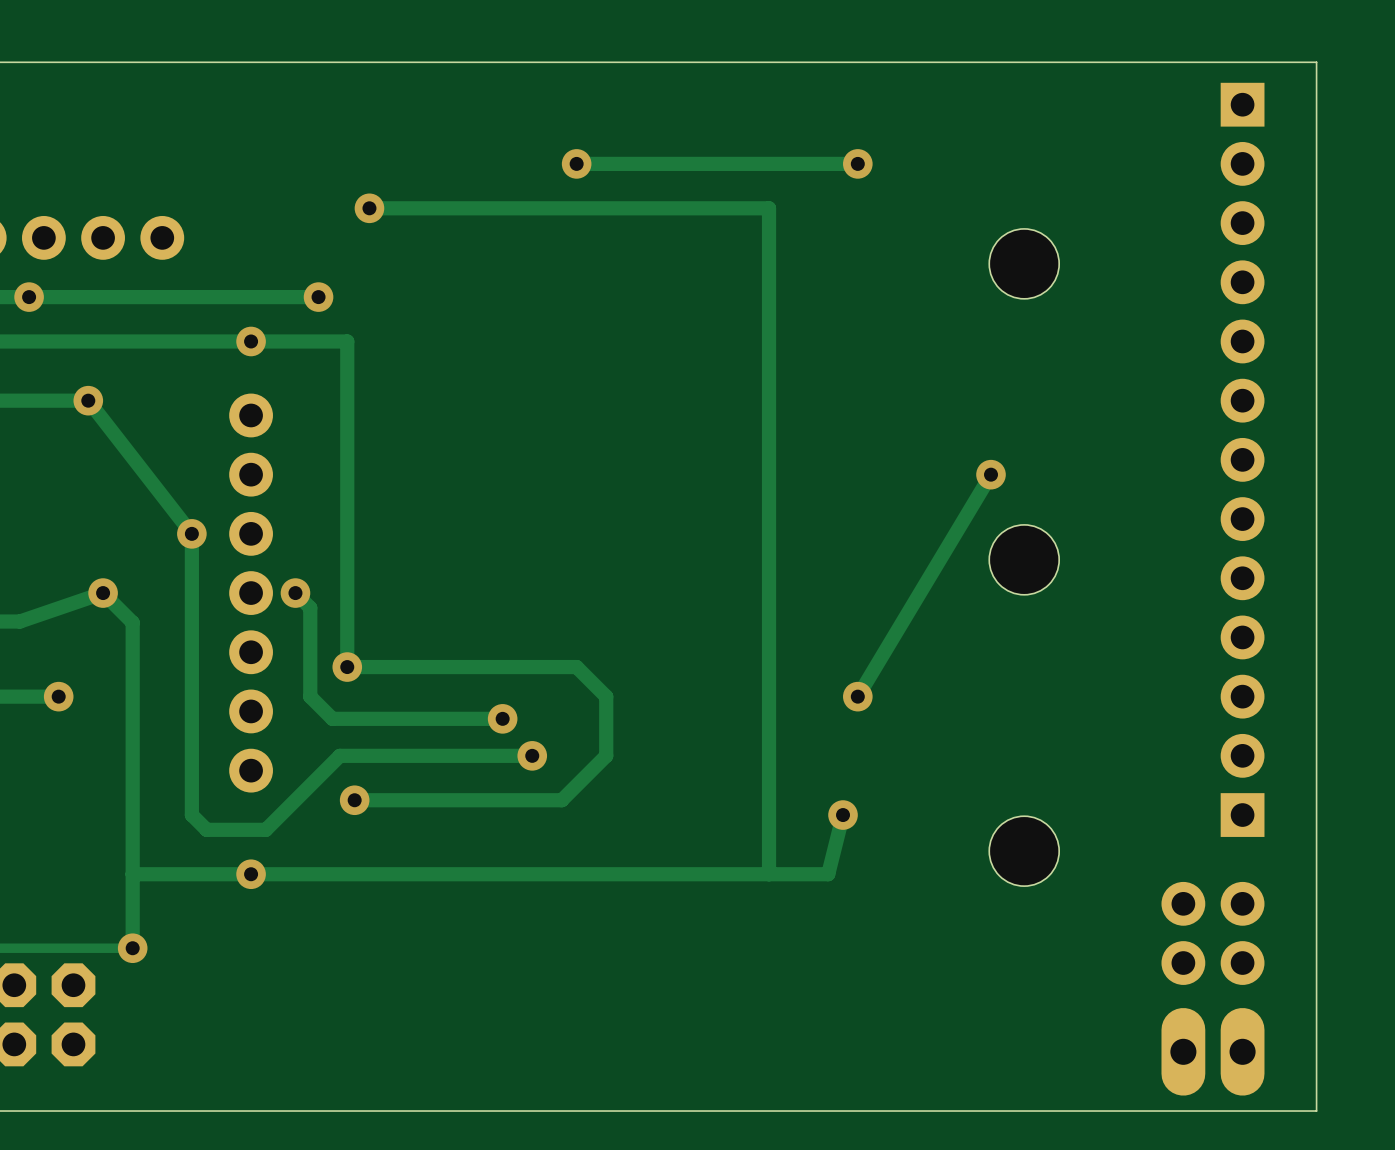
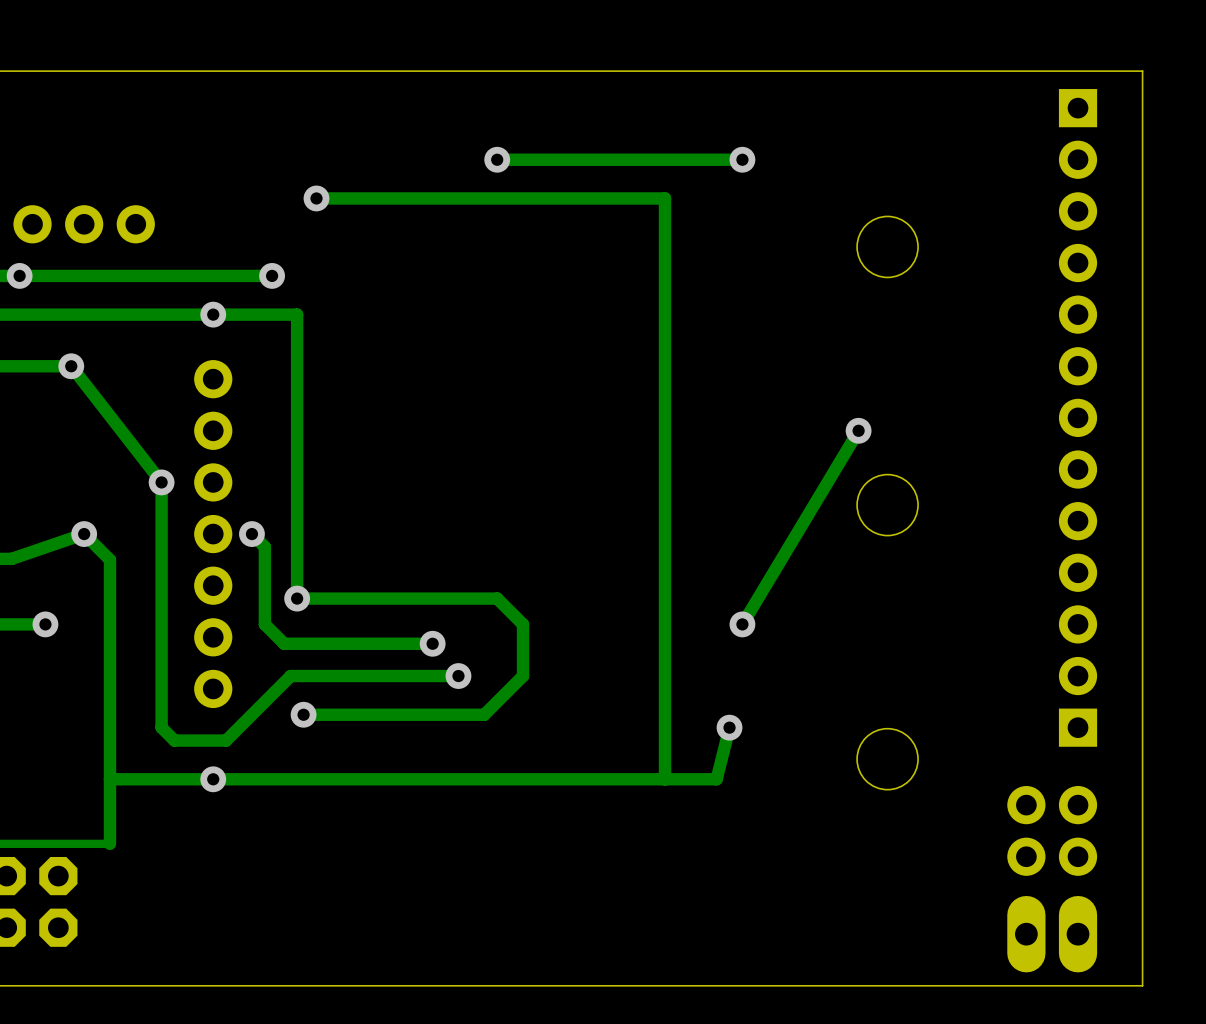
via: (132, 948) -> none

